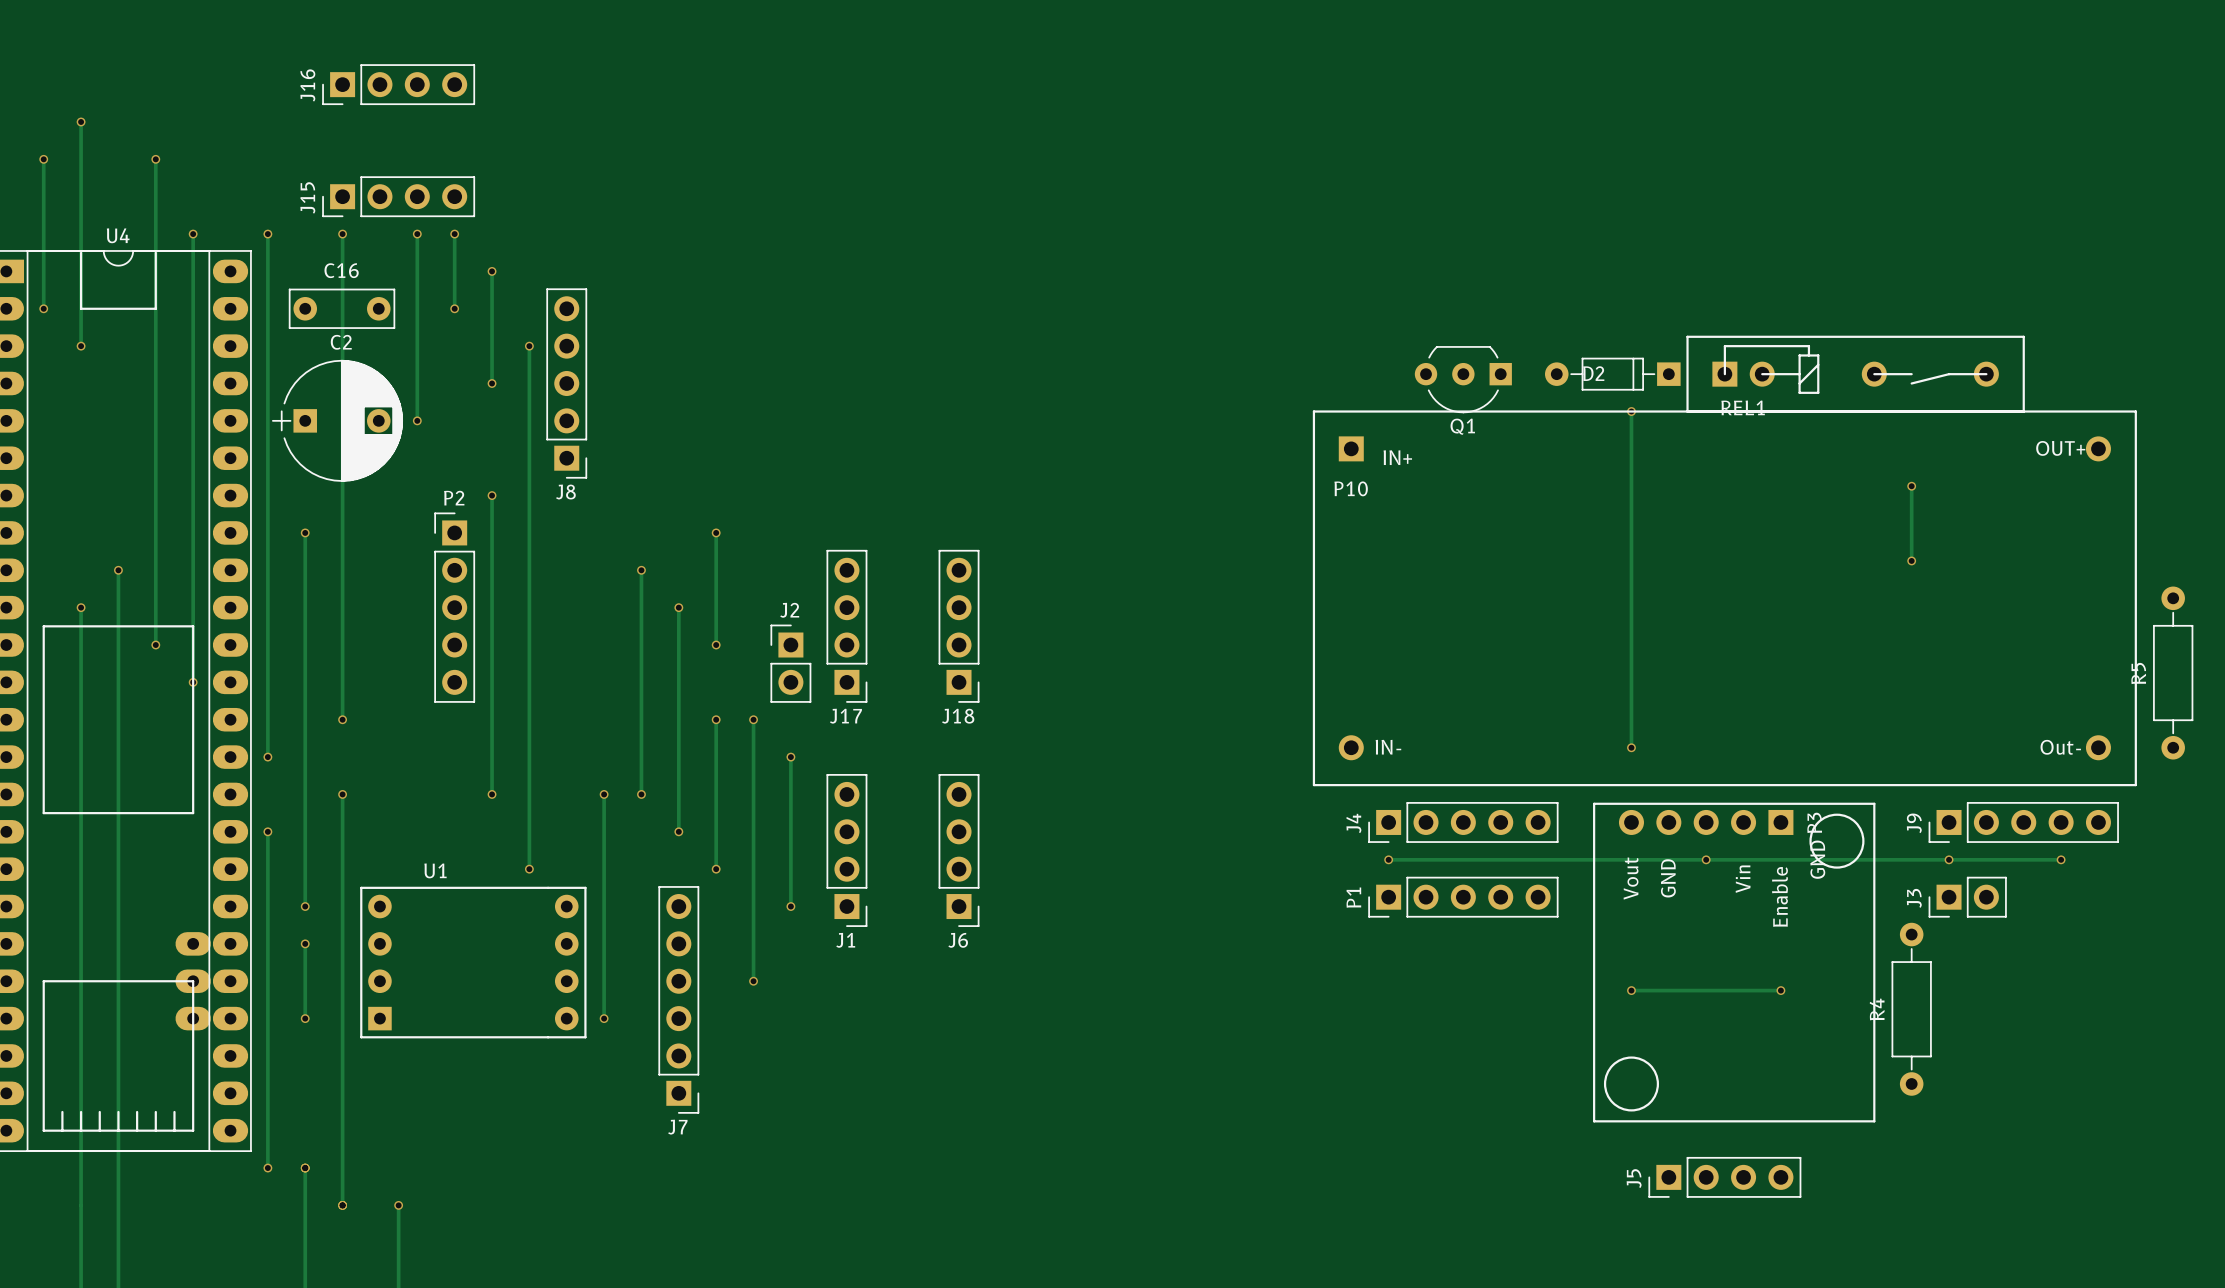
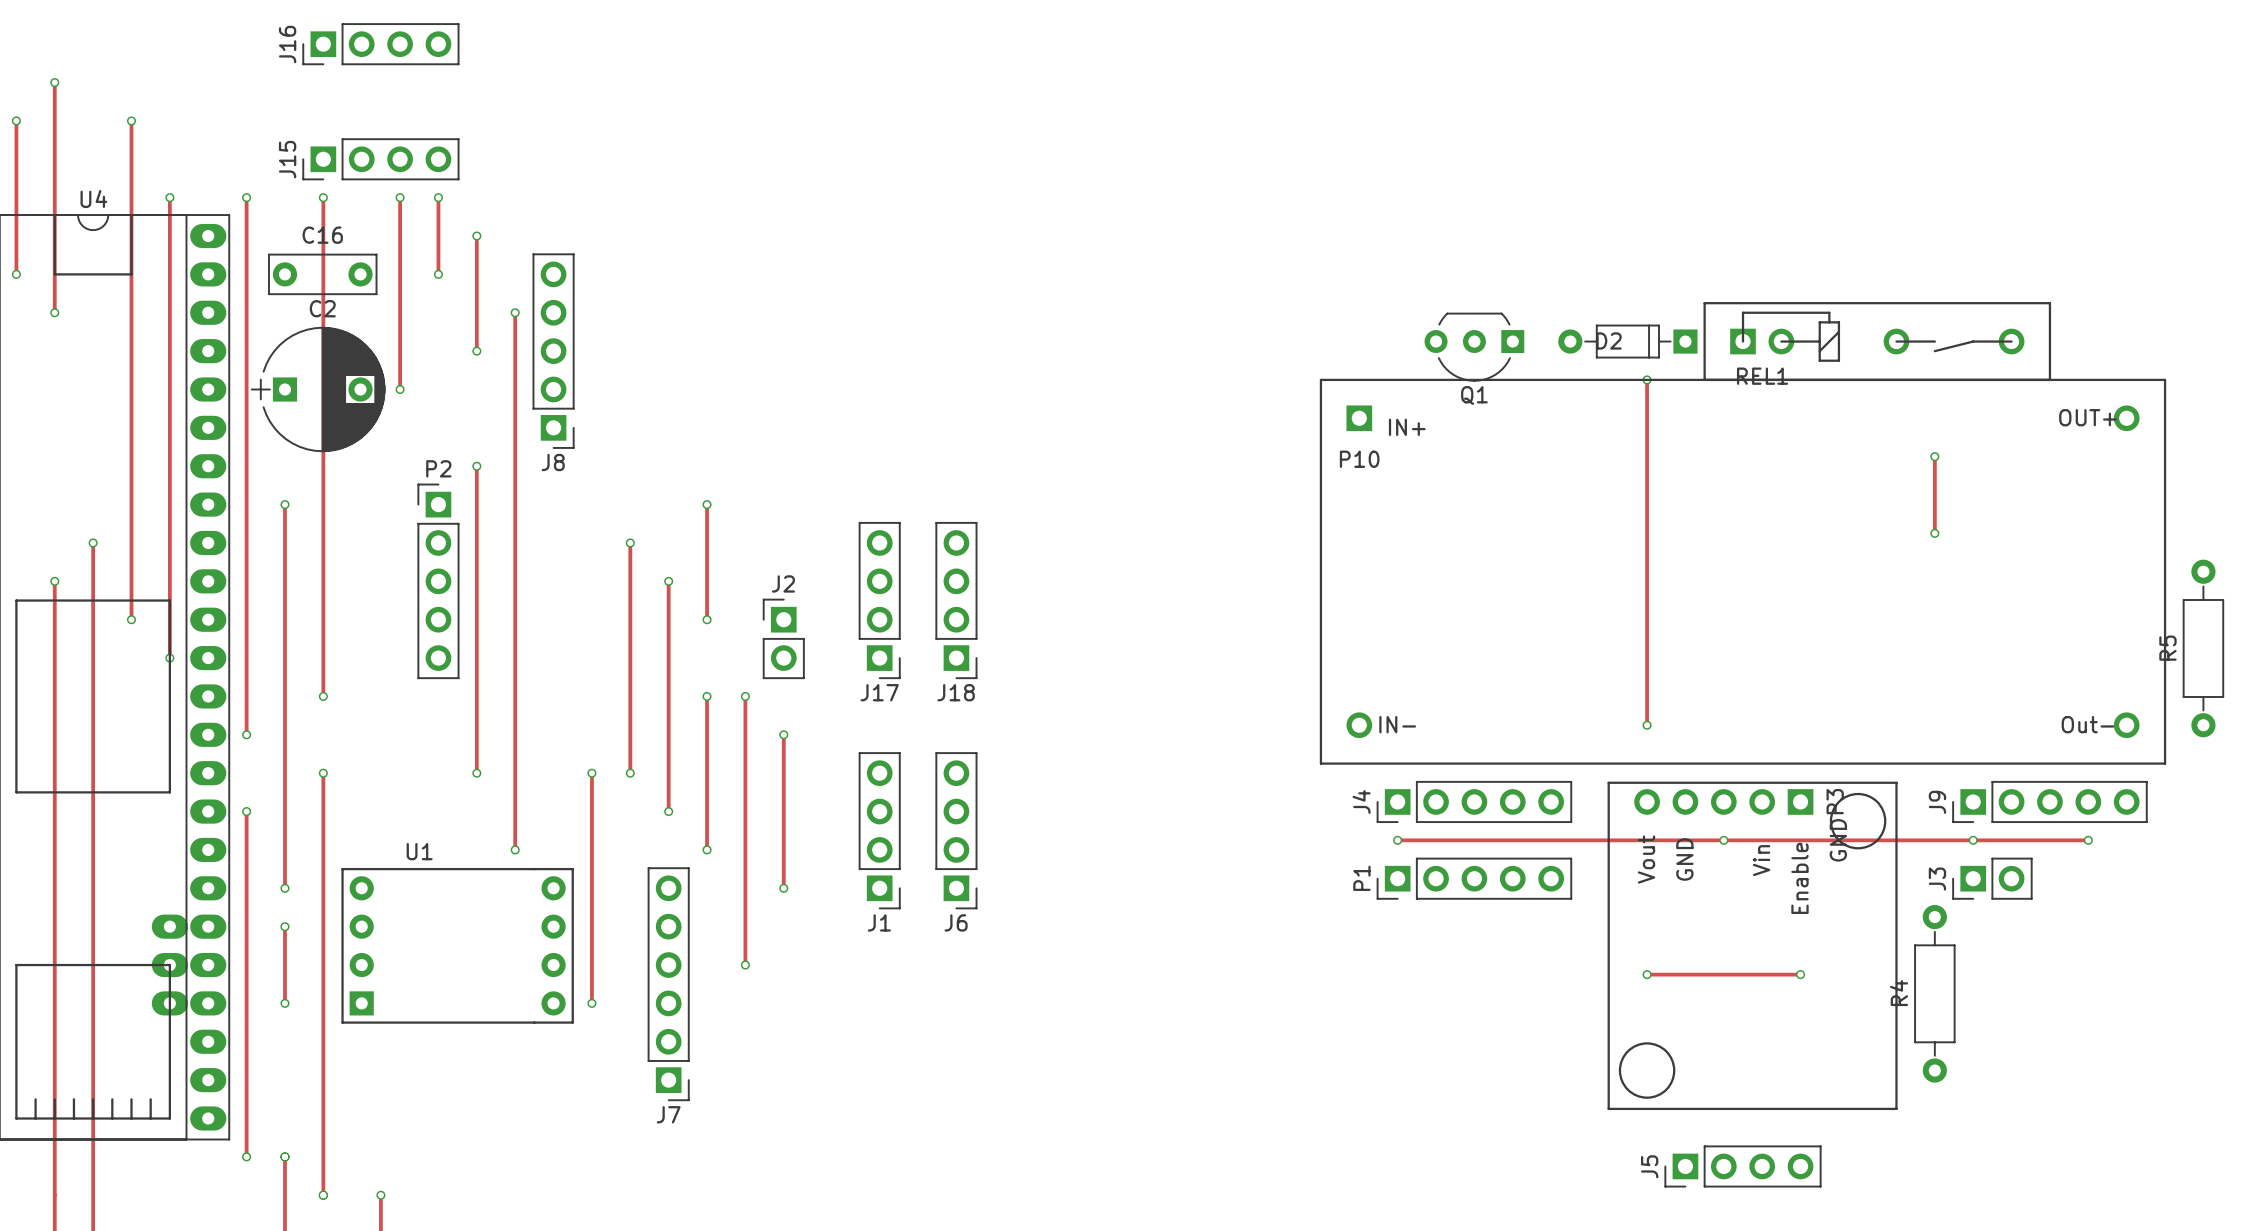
J17 position: (846, 626) -> (879, 600)
J1 position: (846, 850) -> (879, 830)

